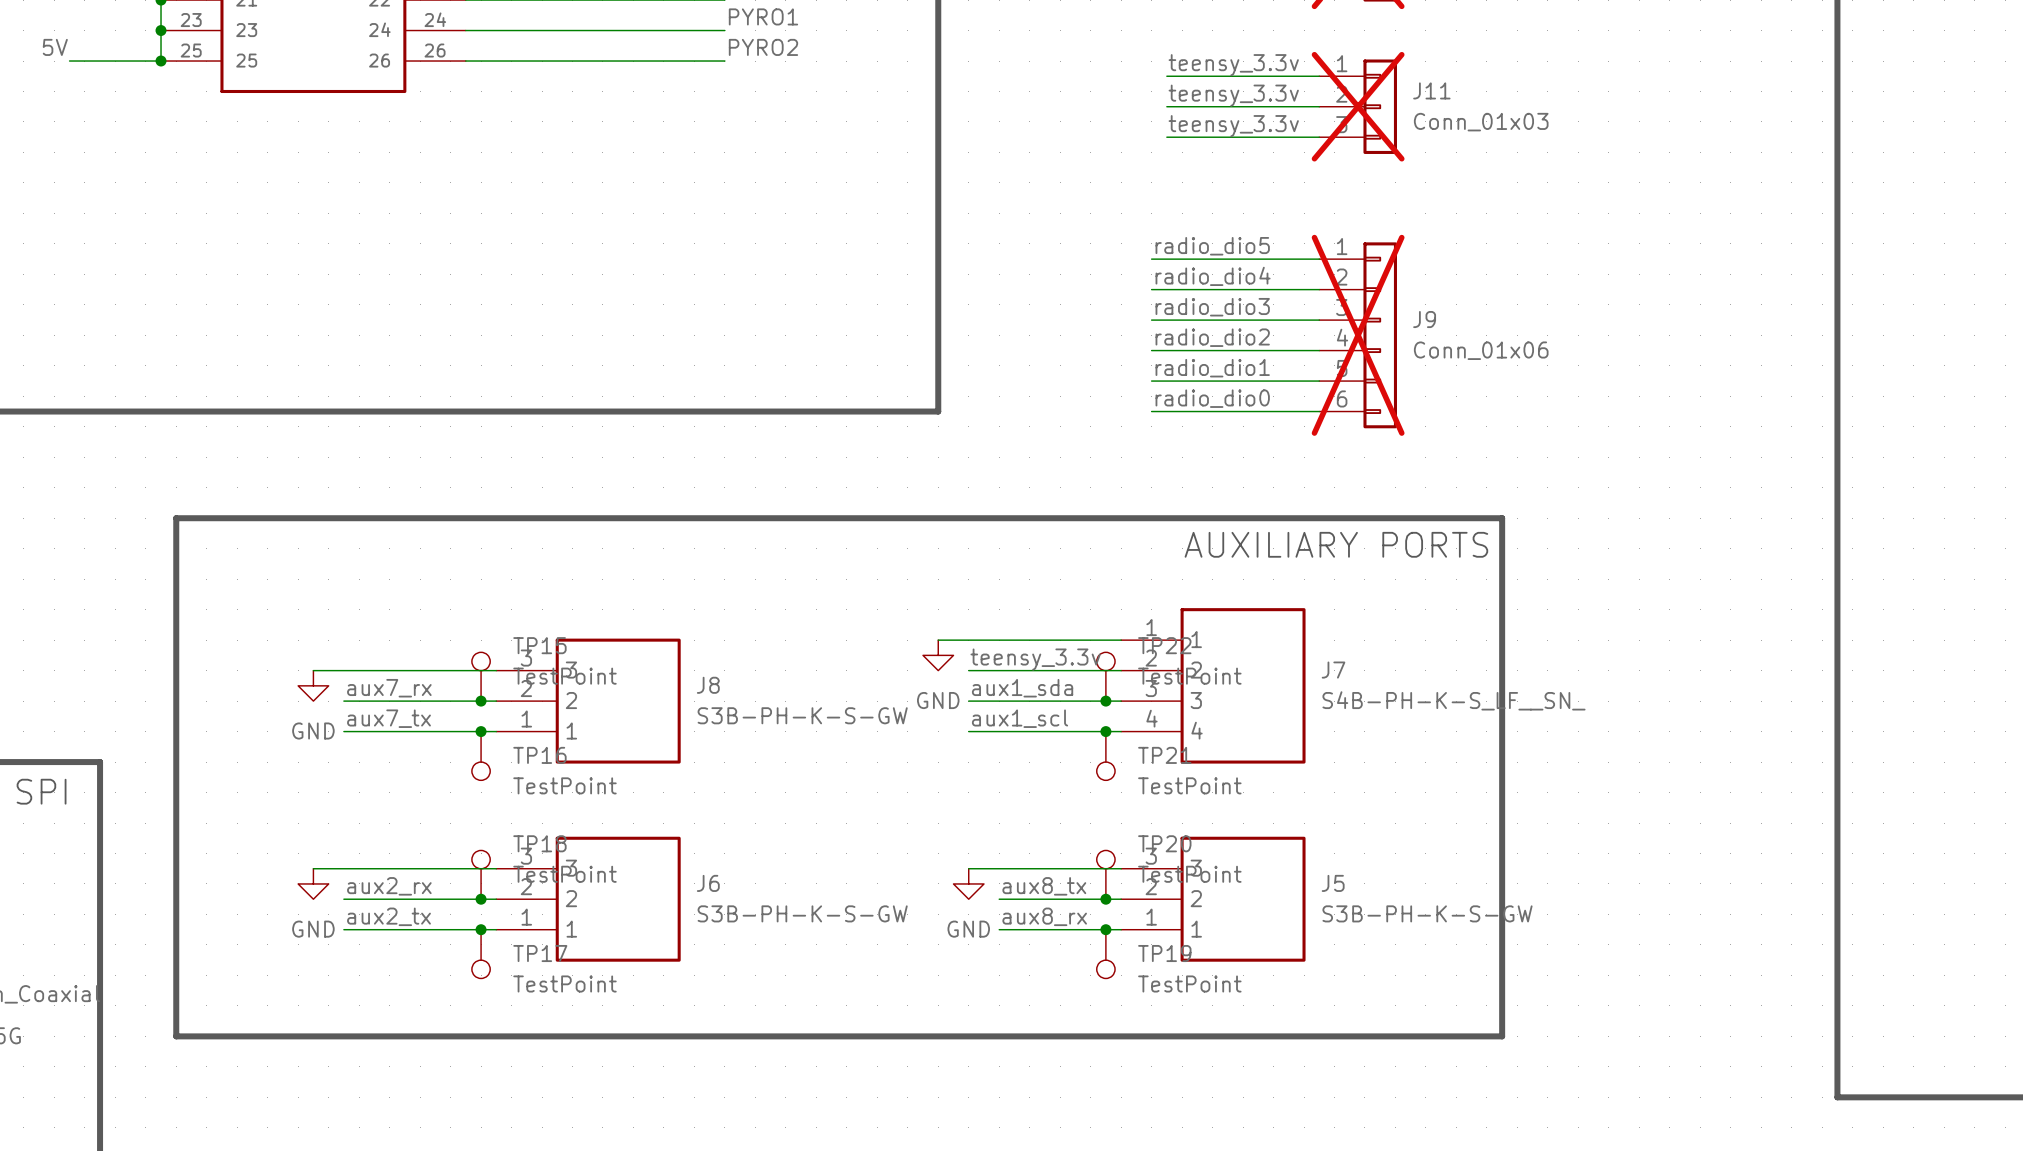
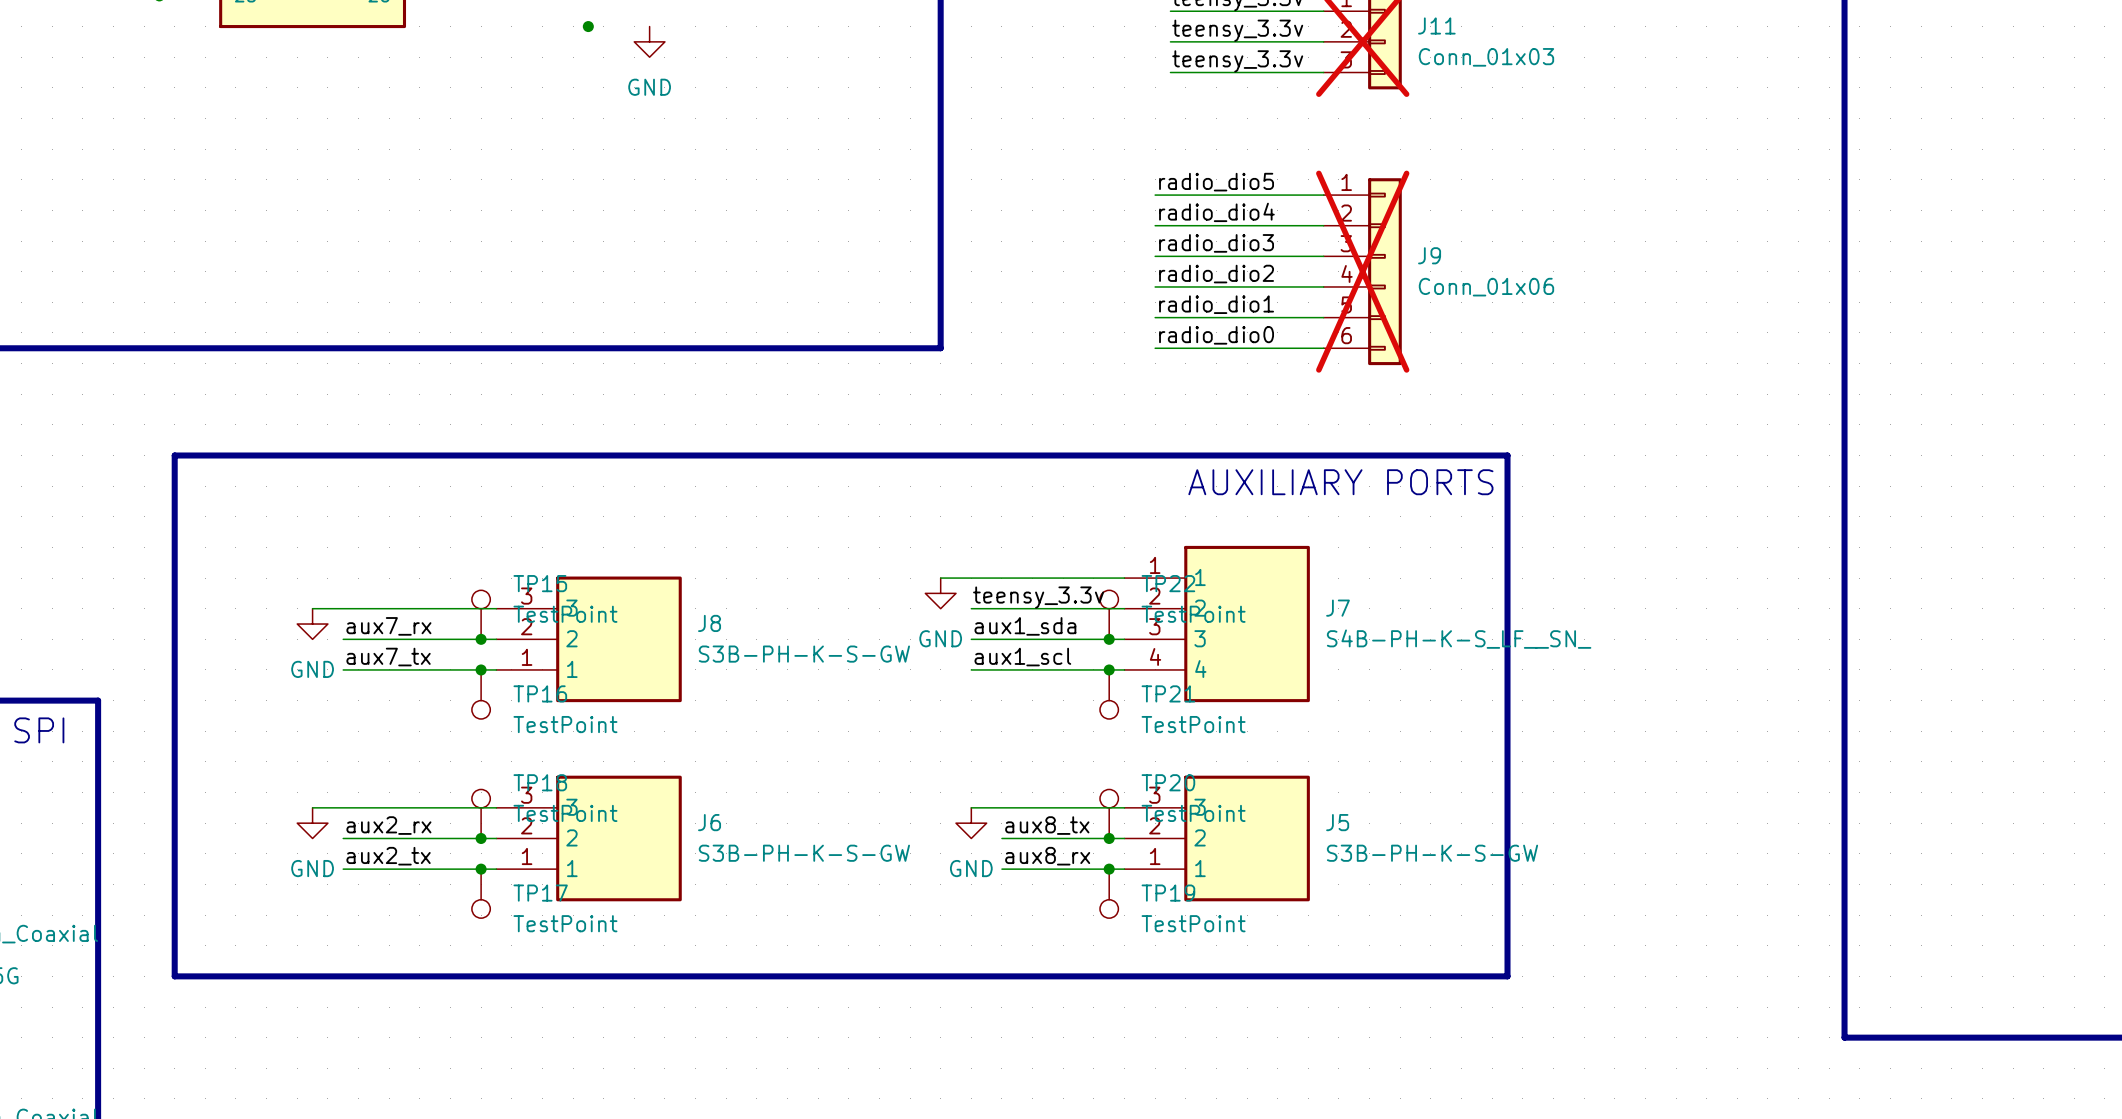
junction: none -> (588, 26)
power symbol: none -> GND (649, 41)

